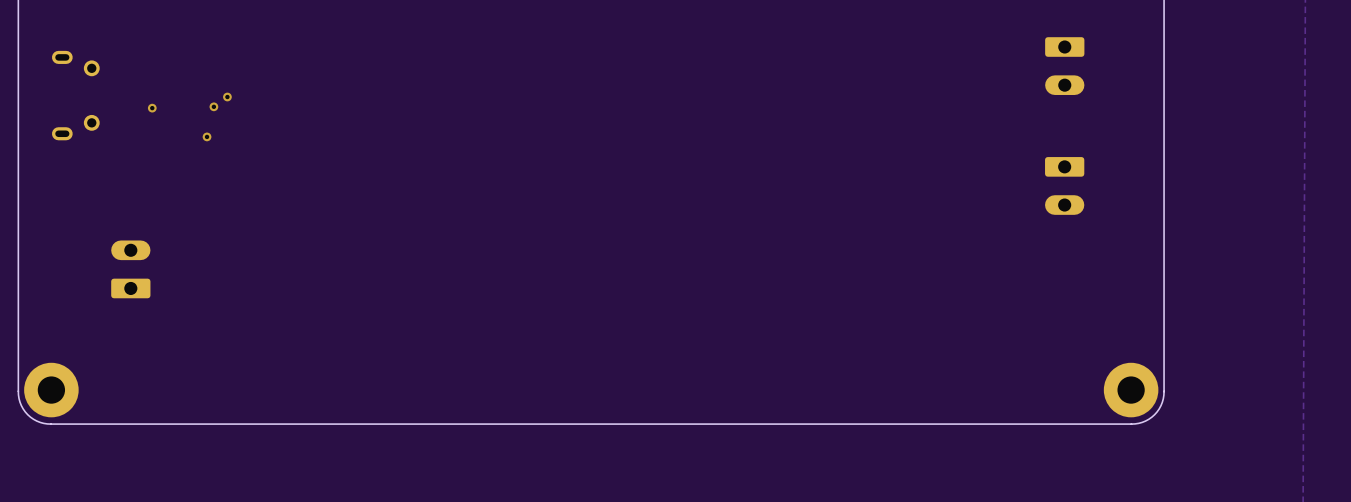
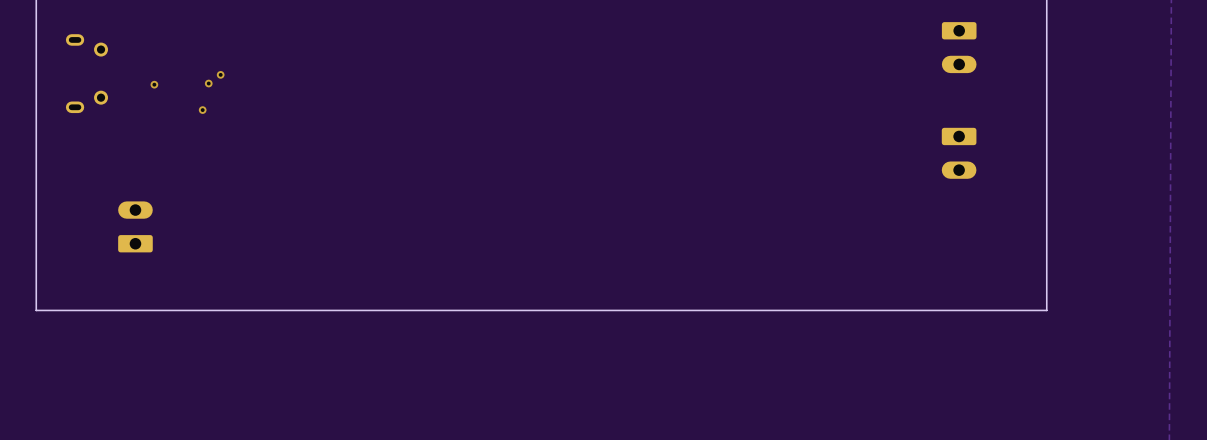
board edge: (1164, 364) (1163, 395) (1160, 405) (1148, 419) (1131, 424) (47, 423) (33, 419) (21, 405) (18, 394) (18, 364) -> (1046, 310) (36, 310)
part: (51, 390) -> none
part: (1131, 390) -> none

